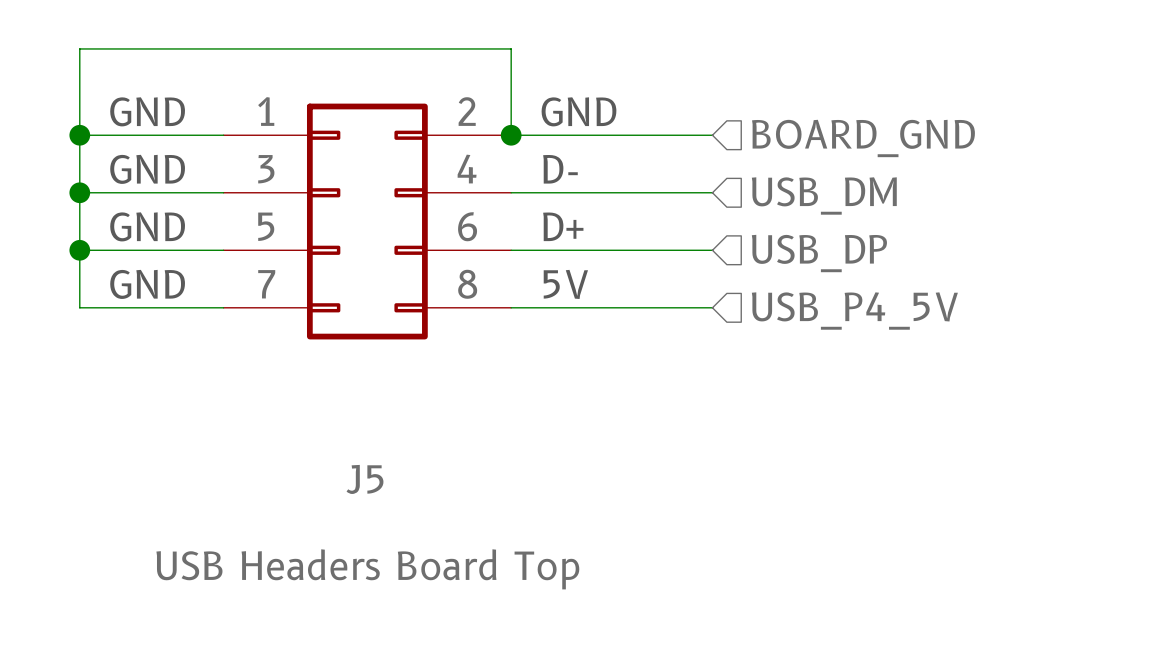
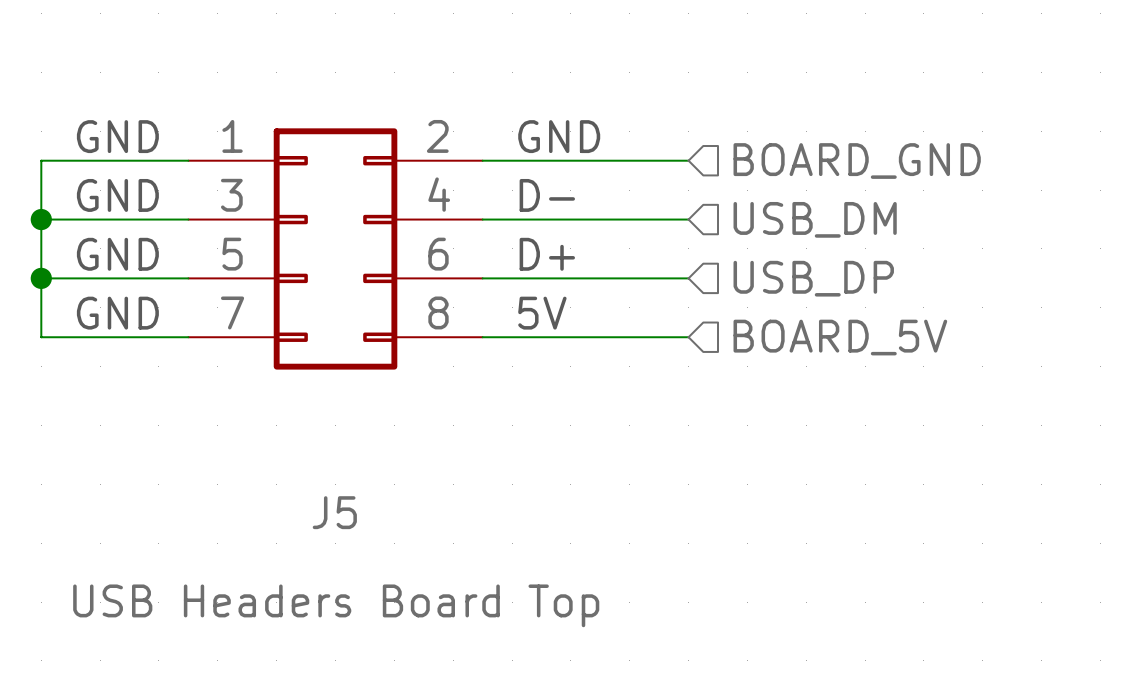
wire: (79, 135) (79, 48) (511, 48) (511, 135) -> none
junction: (79, 135) -> none
junction: (511, 135) -> none
hierarchical label: USB_P4_5V (854, 311) -> BOARD_5V (840, 337)

